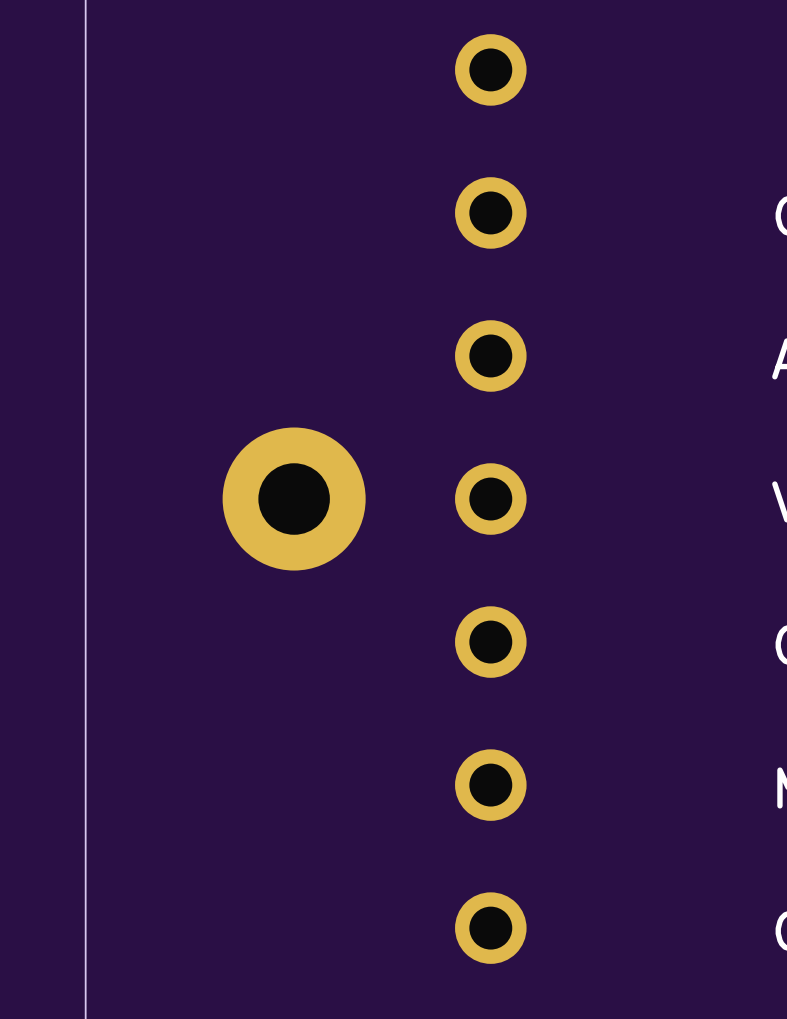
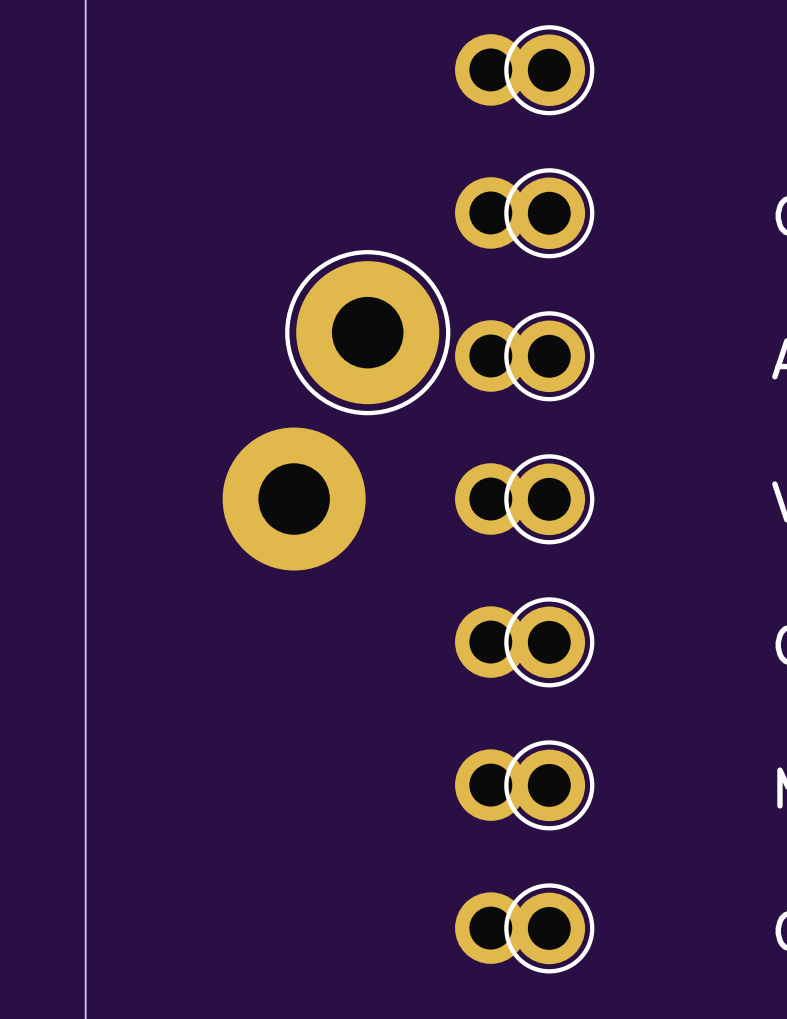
part: none -> (549, 70)
part: none -> (549, 213)
part: none -> (367, 332)
part: none -> (549, 356)
part: none -> (549, 499)
part: none -> (549, 642)
part: none -> (549, 785)
part: none -> (549, 928)

